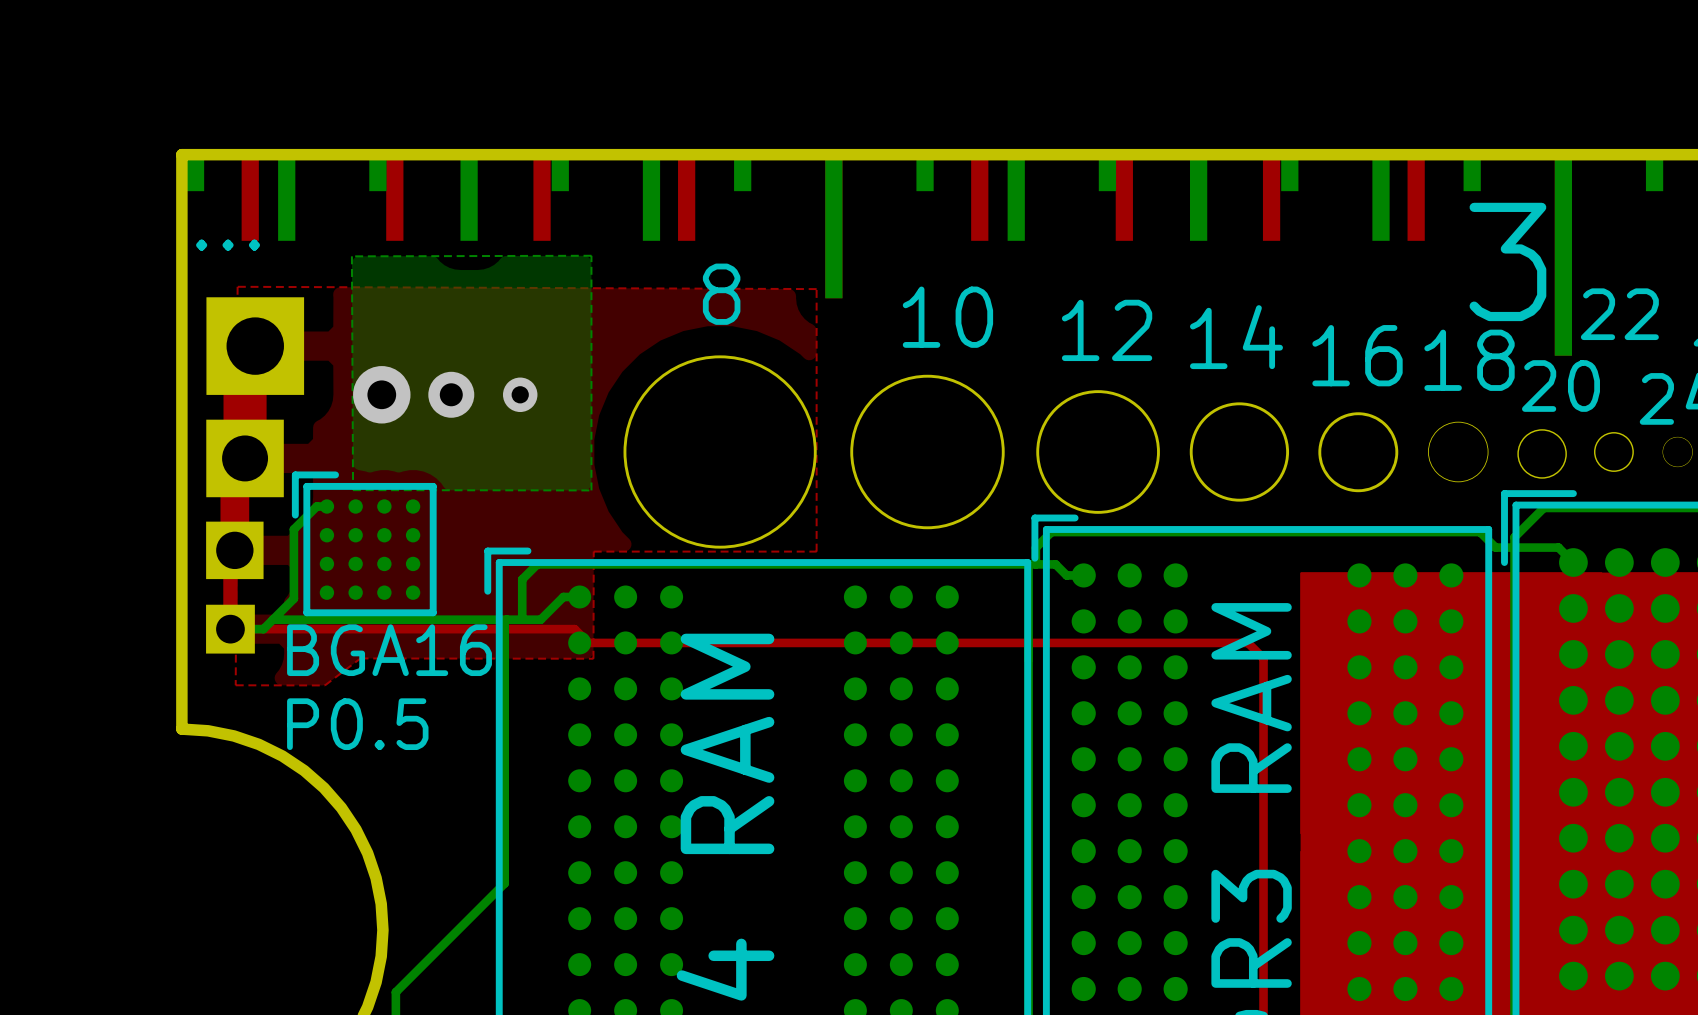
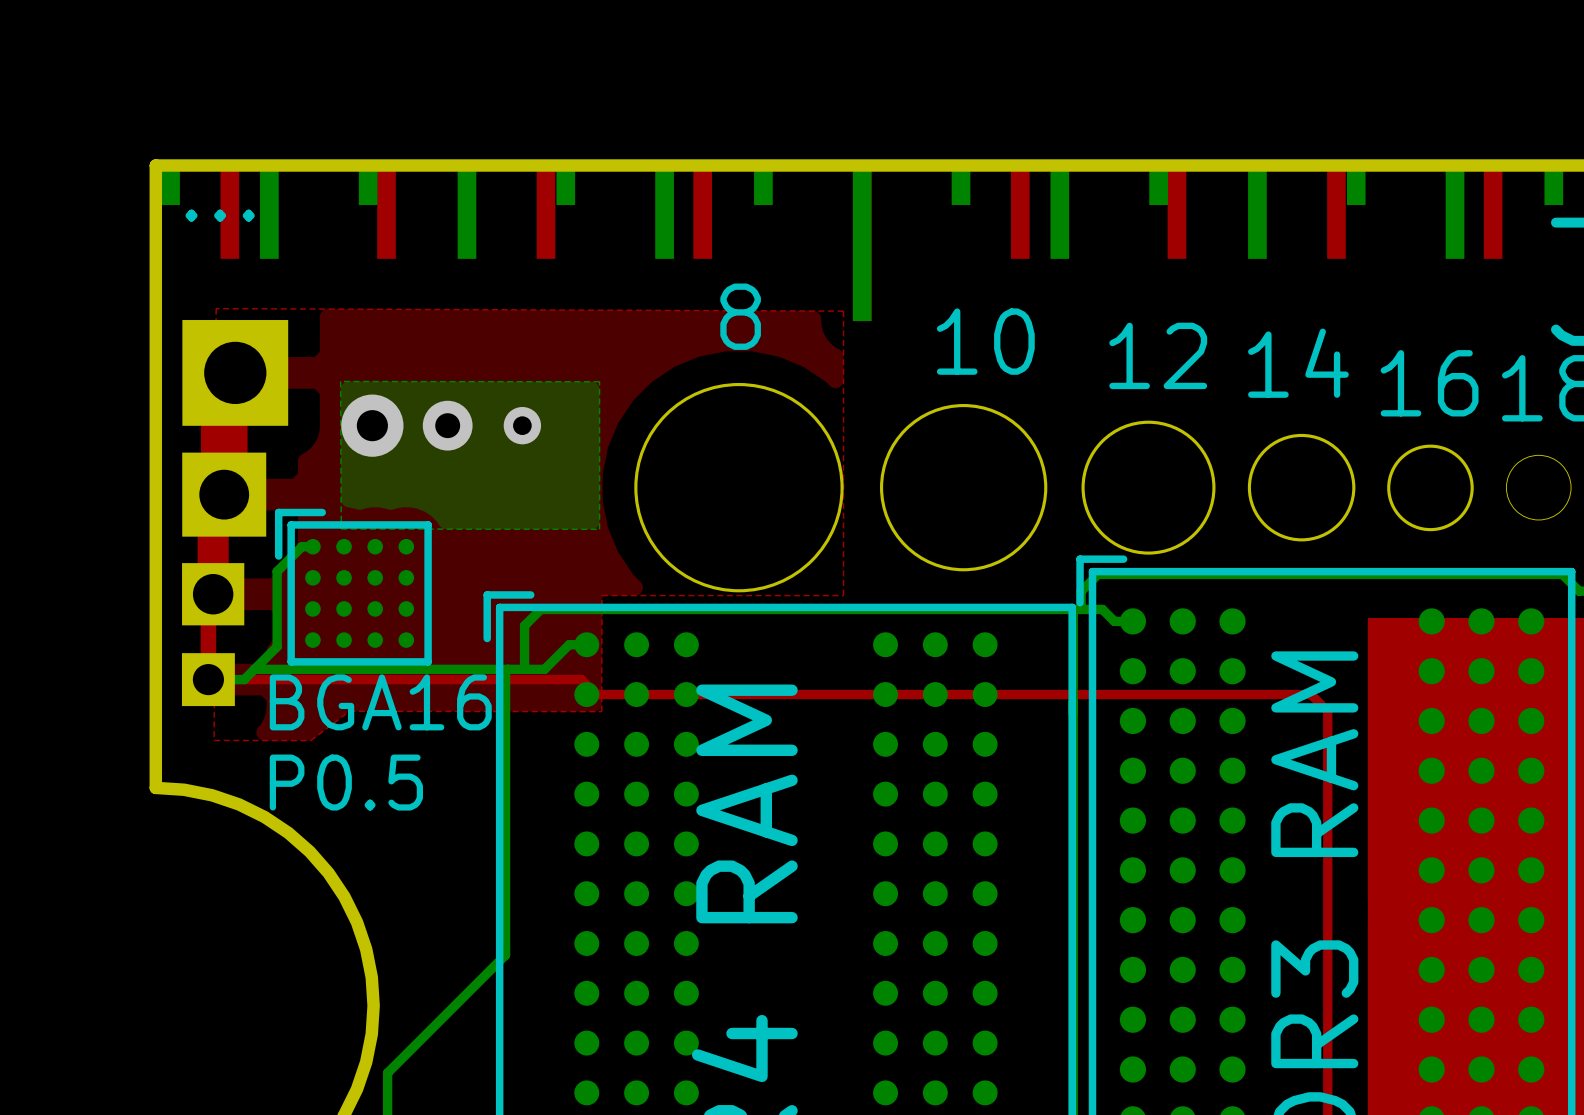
text position: ... (228, 245) -> ... (220, 215)
bottom zone outline: (591, 354) (591, 255) (351, 256) (353, 490) -> (599, 381) (340, 381) (341, 528)

